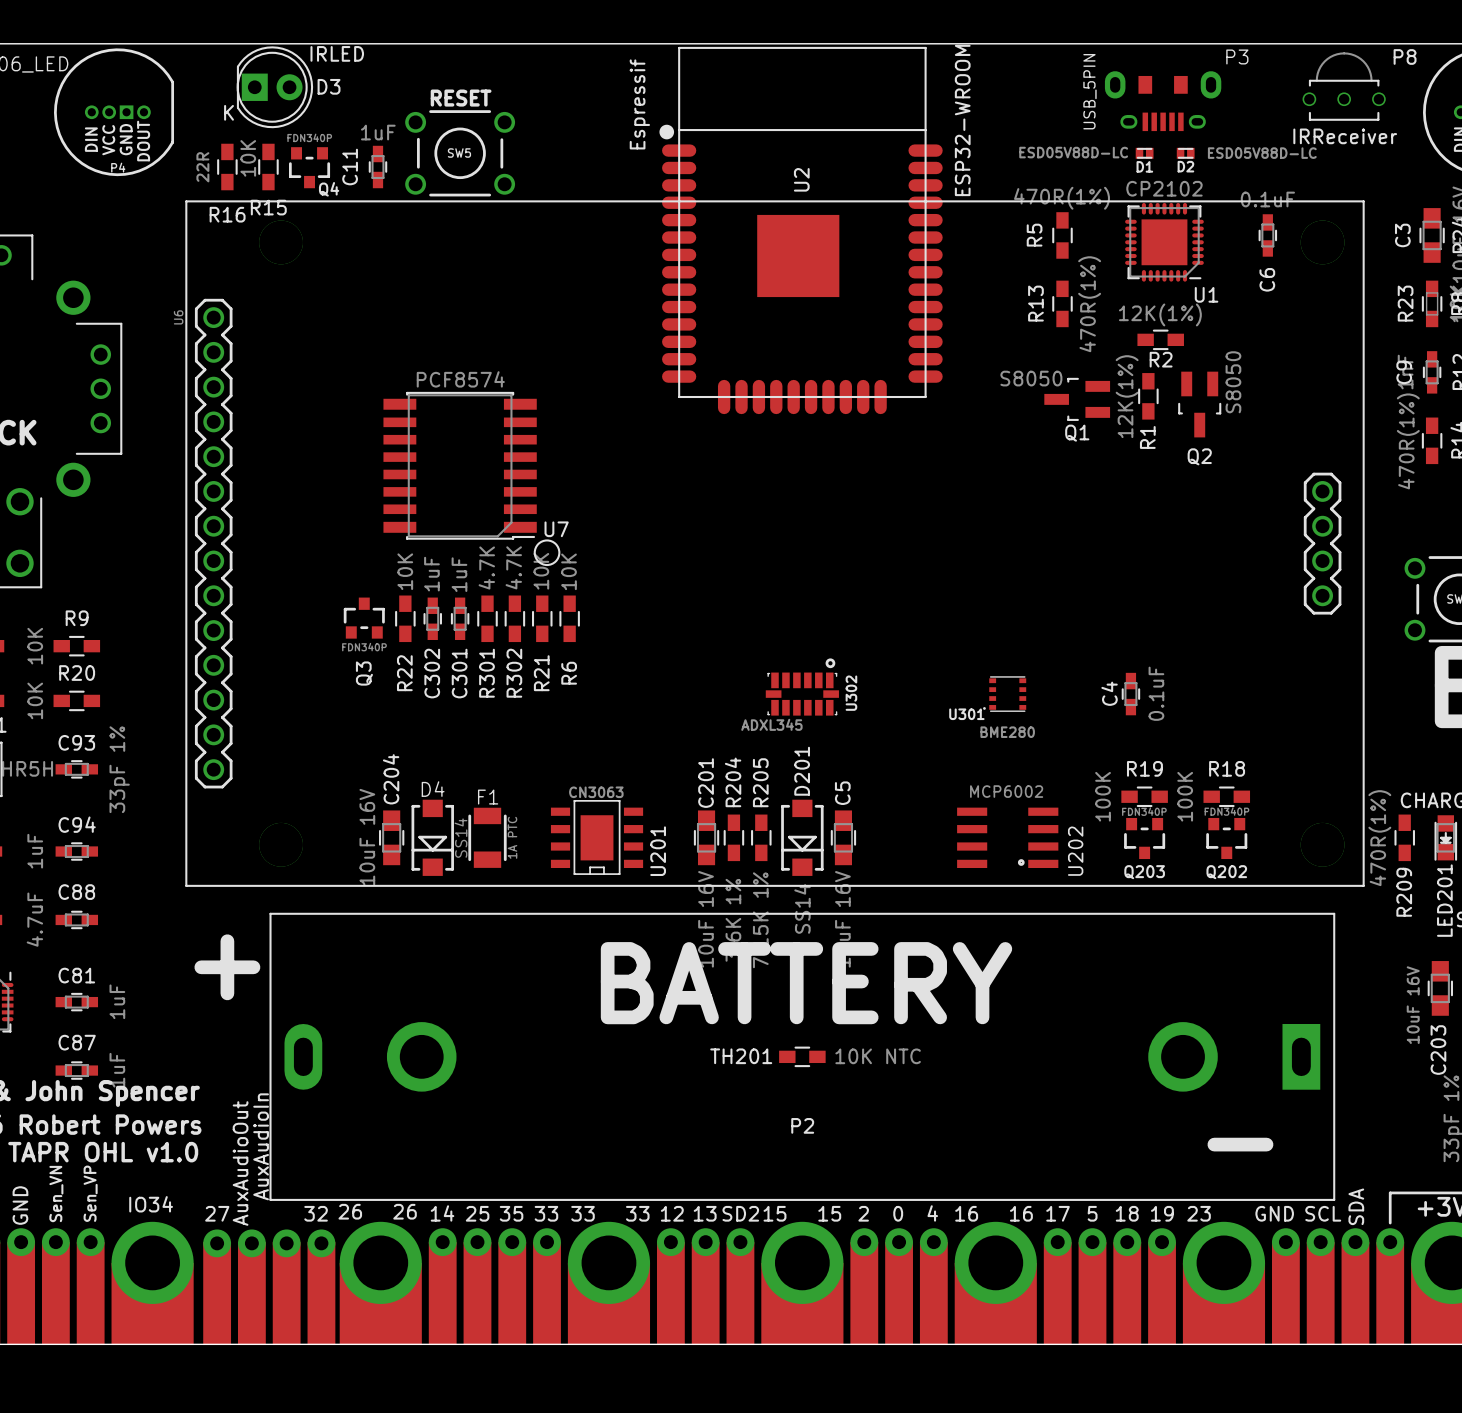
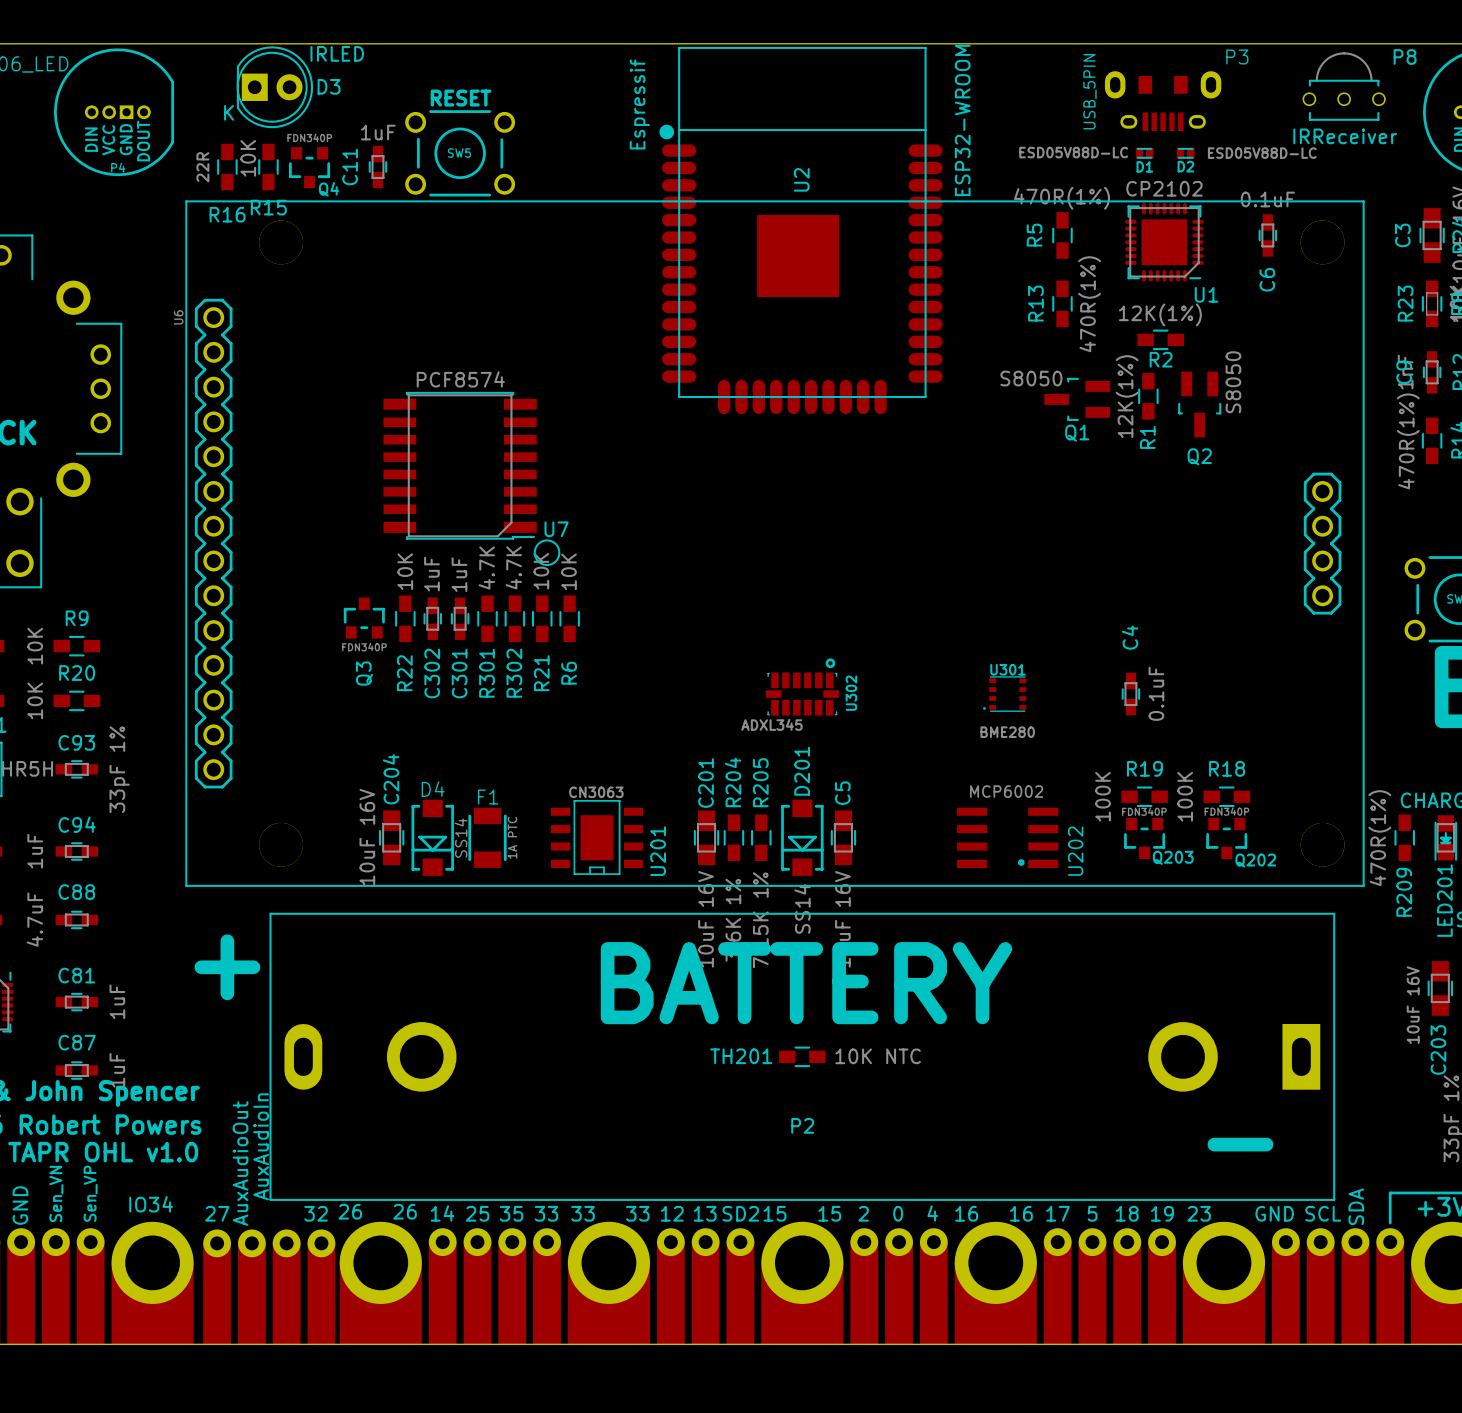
C4 name position: C4 (1109, 693) -> C4 (1130, 637)
U301 name position: U301 (966, 714) -> U301 (1007, 669)
Q203 name position: Q203 (1144, 872) -> Q203 (1173, 857)
Q202 name position: Q202 (1226, 872) -> Q202 (1255, 860)

